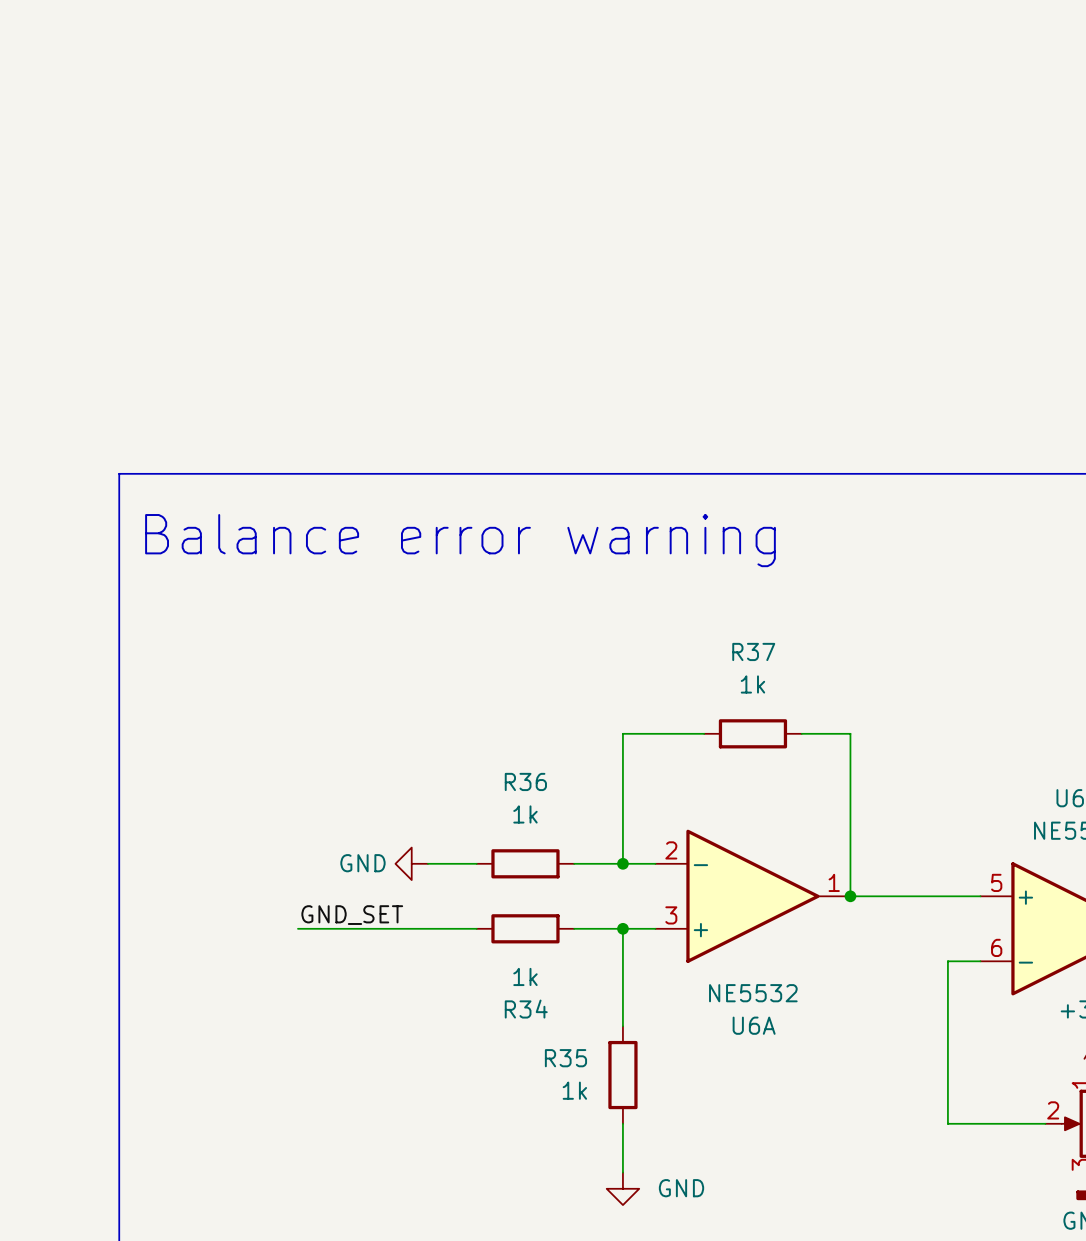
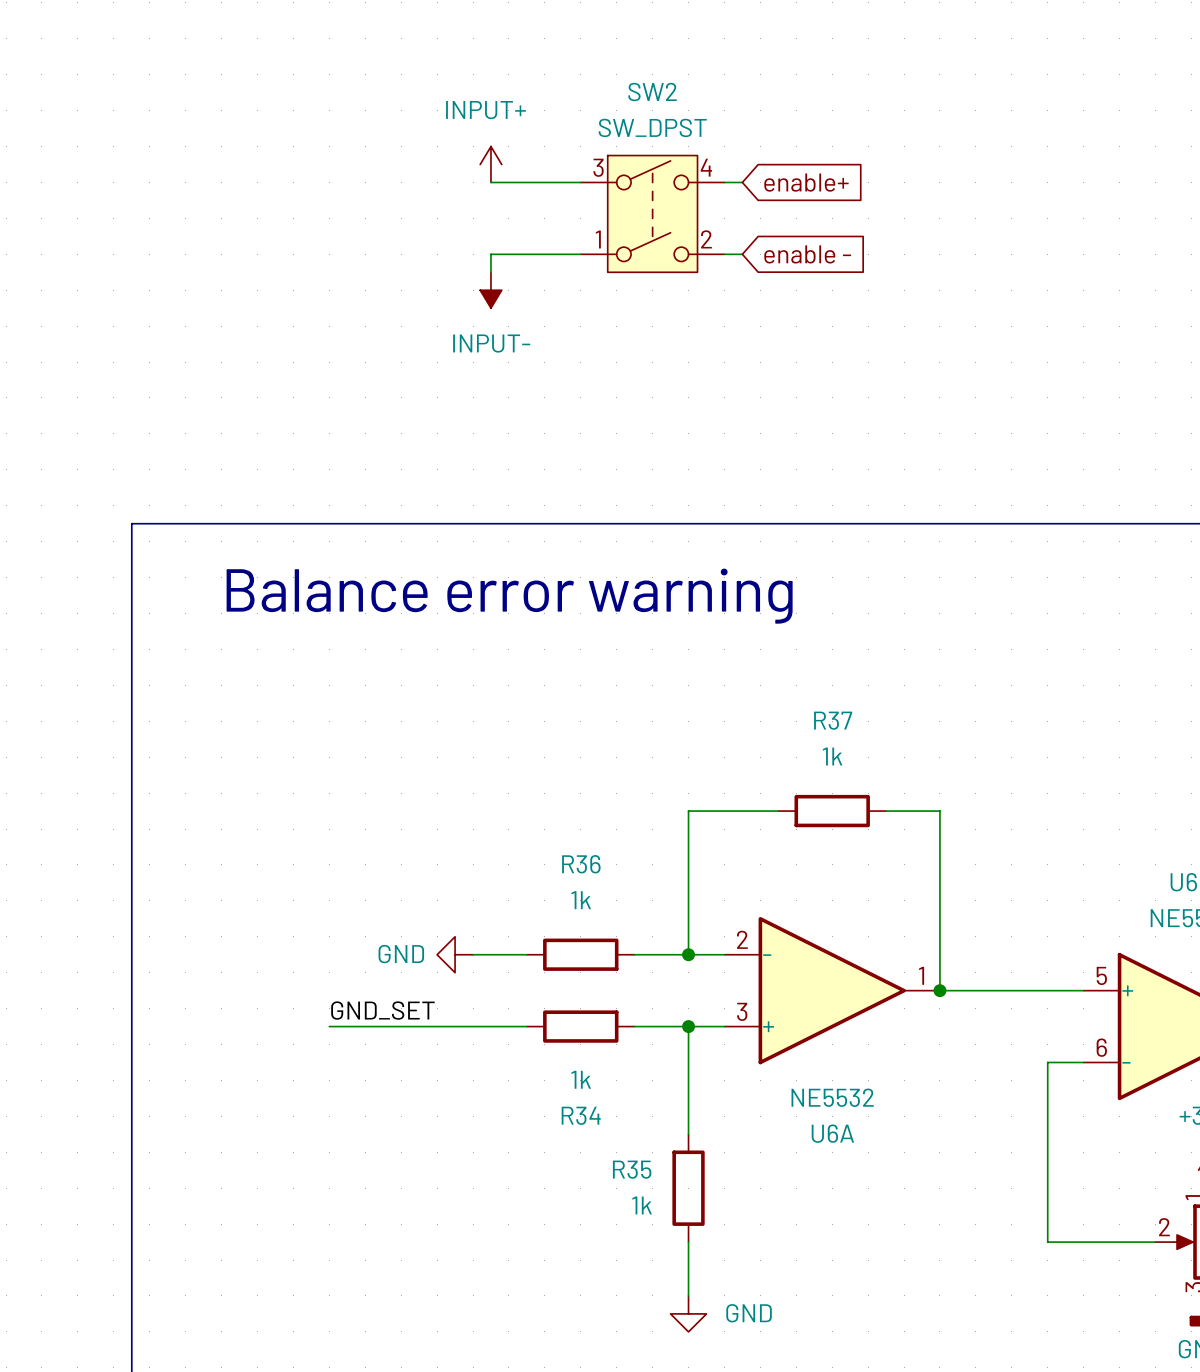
power symbol: none -> INPUT+ (490, 164)
wire: none -> (490, 182) (580, 182)
wire: none -> (724, 182) (742, 182)
global label: none -> enable+ (806, 182)
SW2: none -> SW_DPST (652, 213)
wire: none -> (580, 254) (490, 254) (490, 272)
wire: none -> (724, 254) (742, 254)
global label: none -> enable - (807, 254)
power symbol: none -> INPUT- (490, 290)

